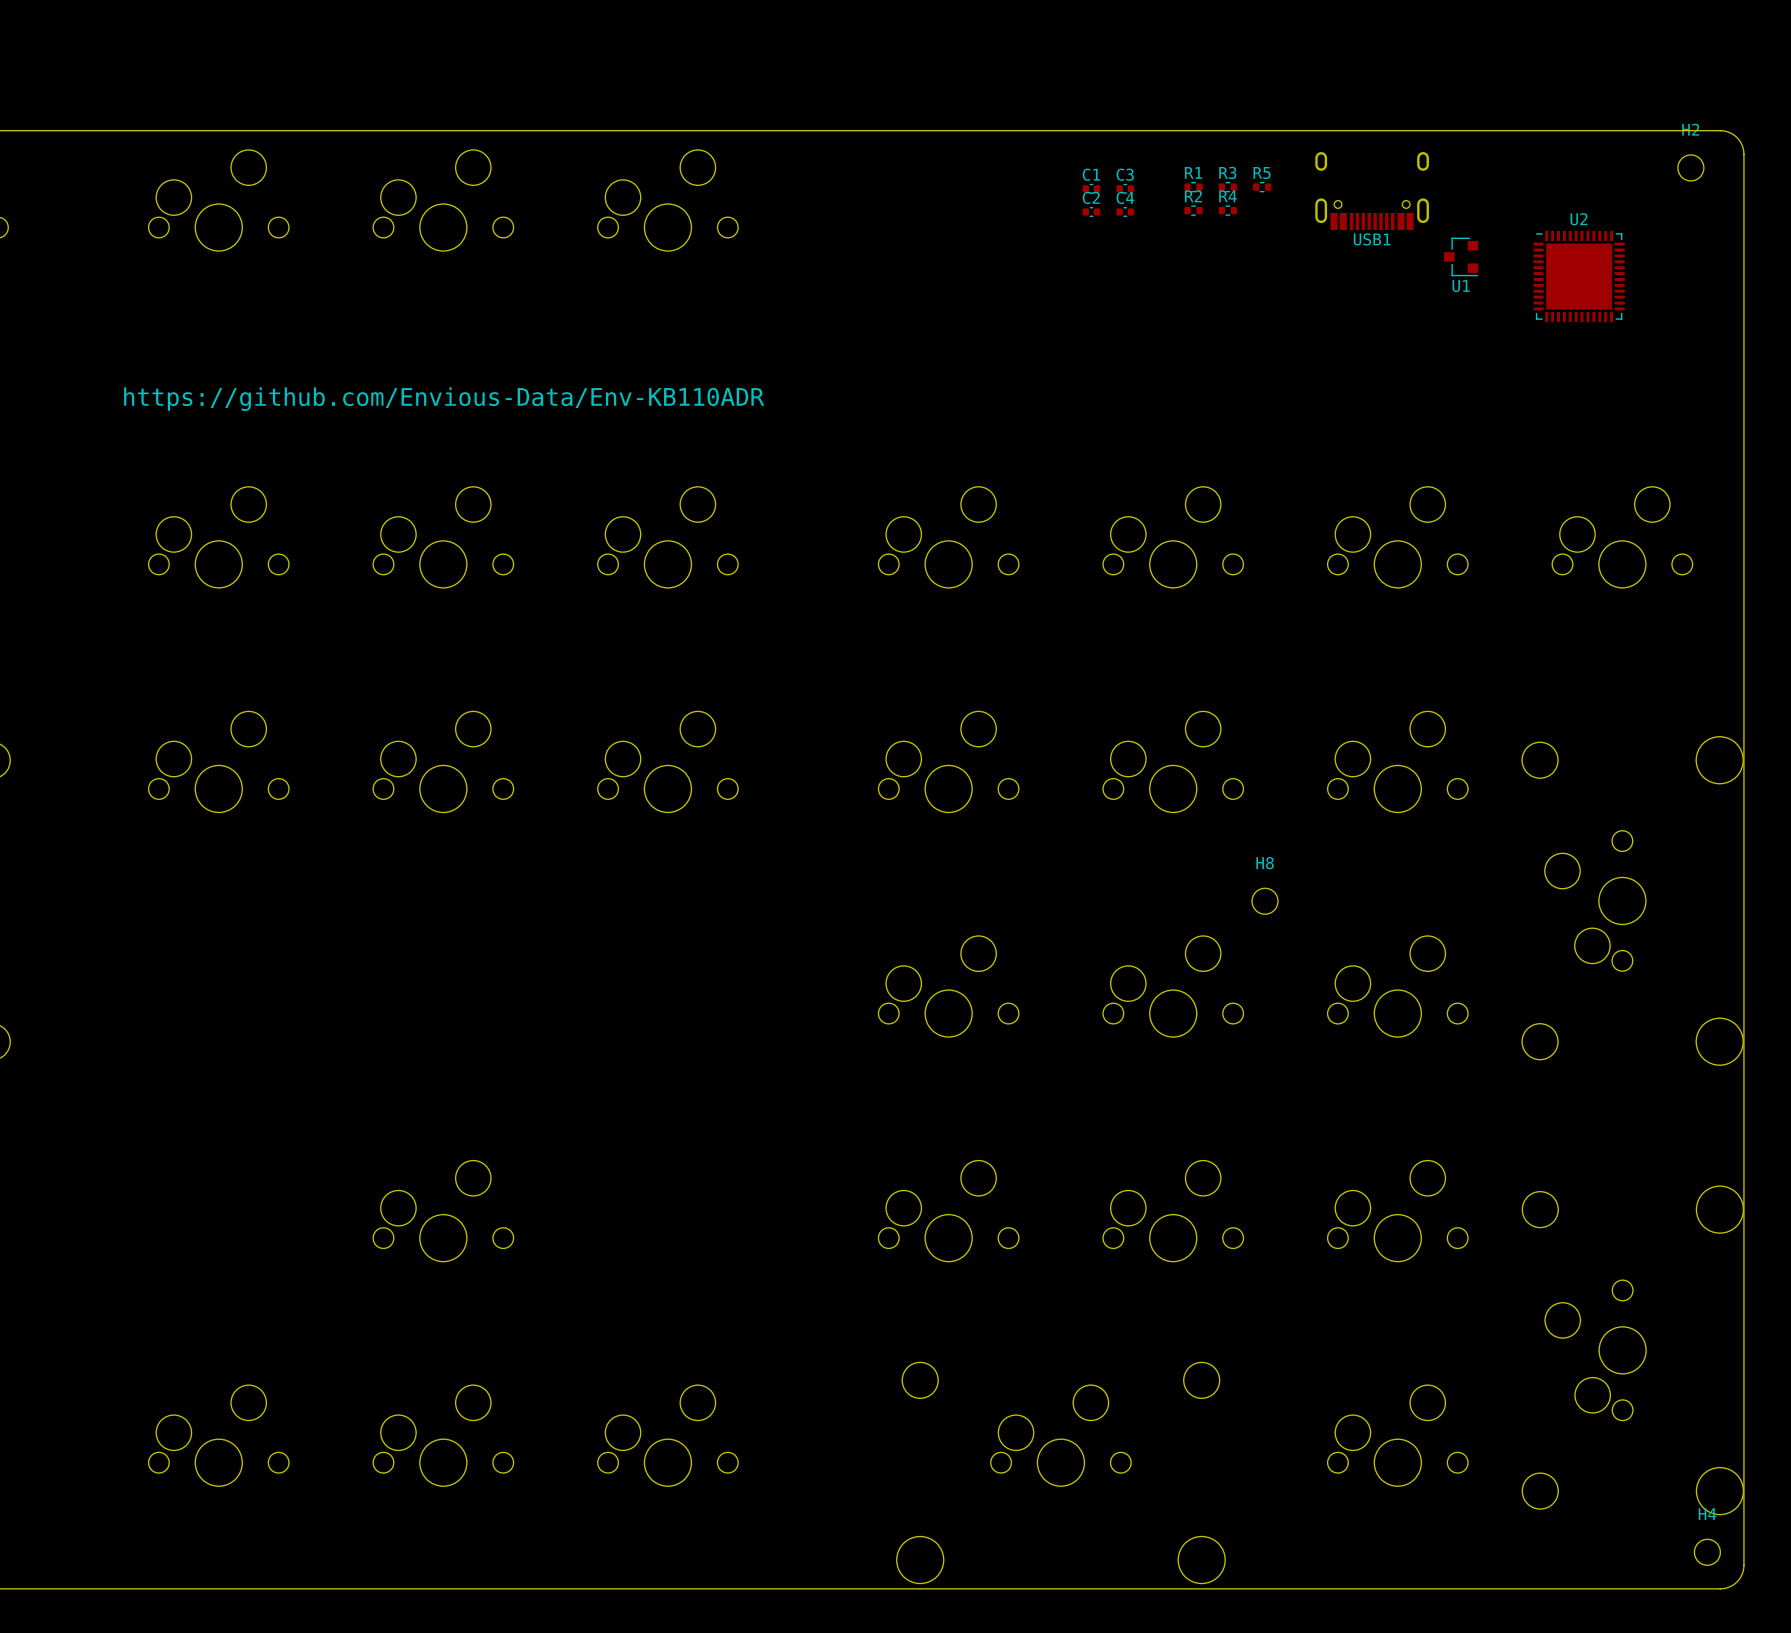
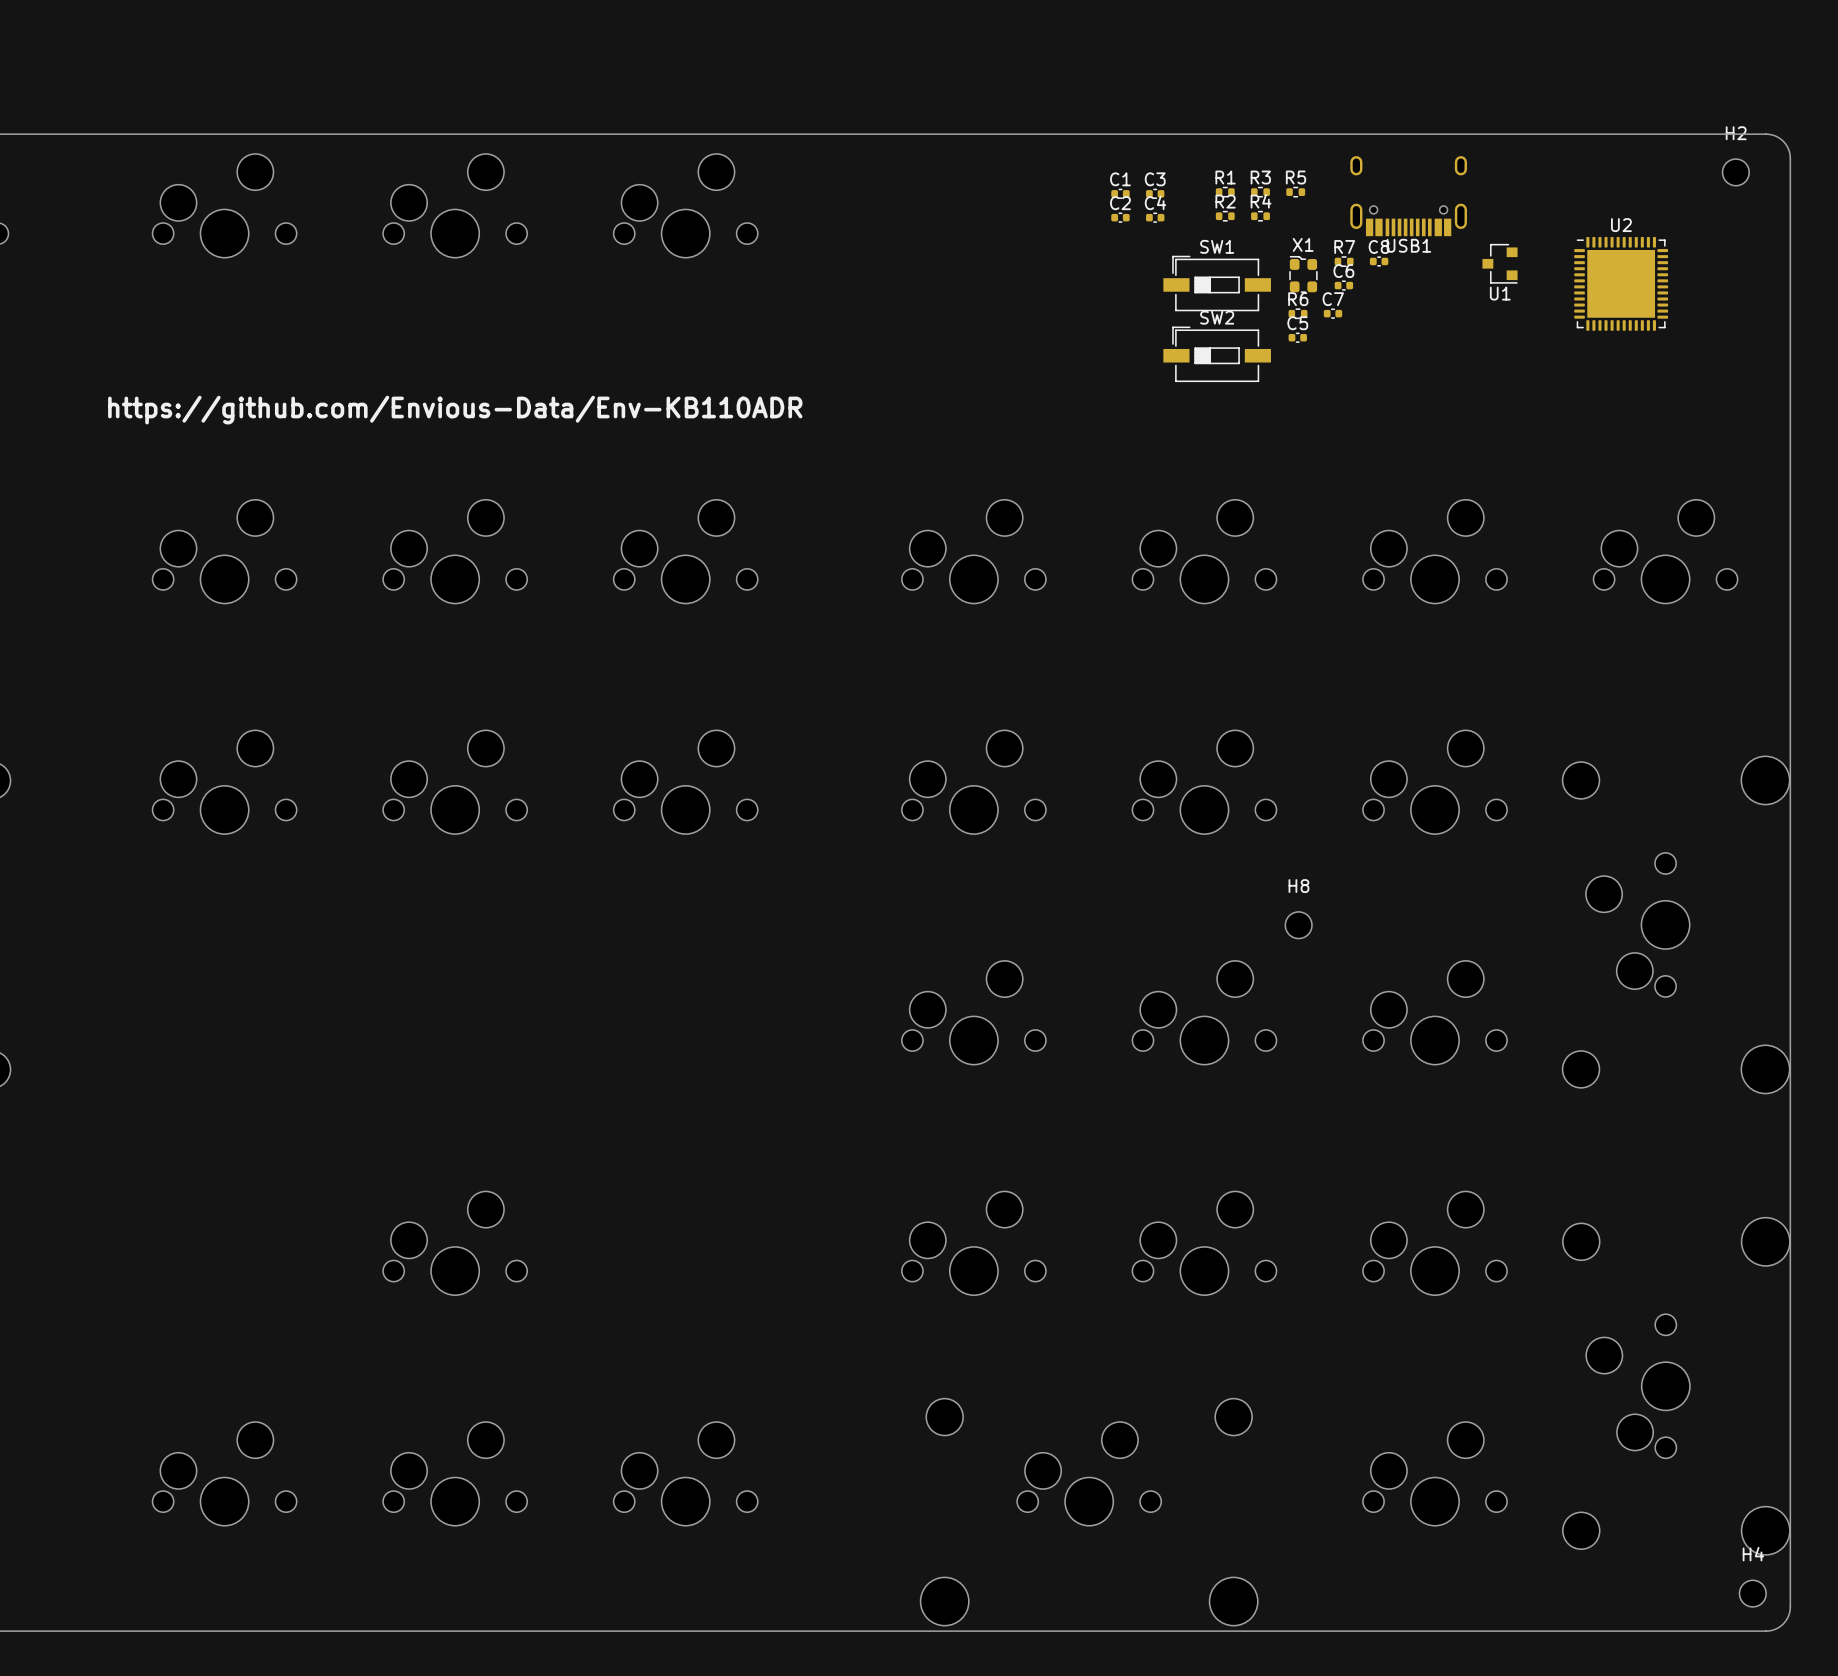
R7: none -> (1344, 261)
C8: none -> (1379, 261)
X1: none -> (1303, 274)
SW1: none -> (1217, 283)
C6: none -> (1343, 285)
R6: none -> (1298, 313)
C7: none -> (1332, 313)
C5: none -> (1297, 337)
SW2: none -> (1217, 354)

